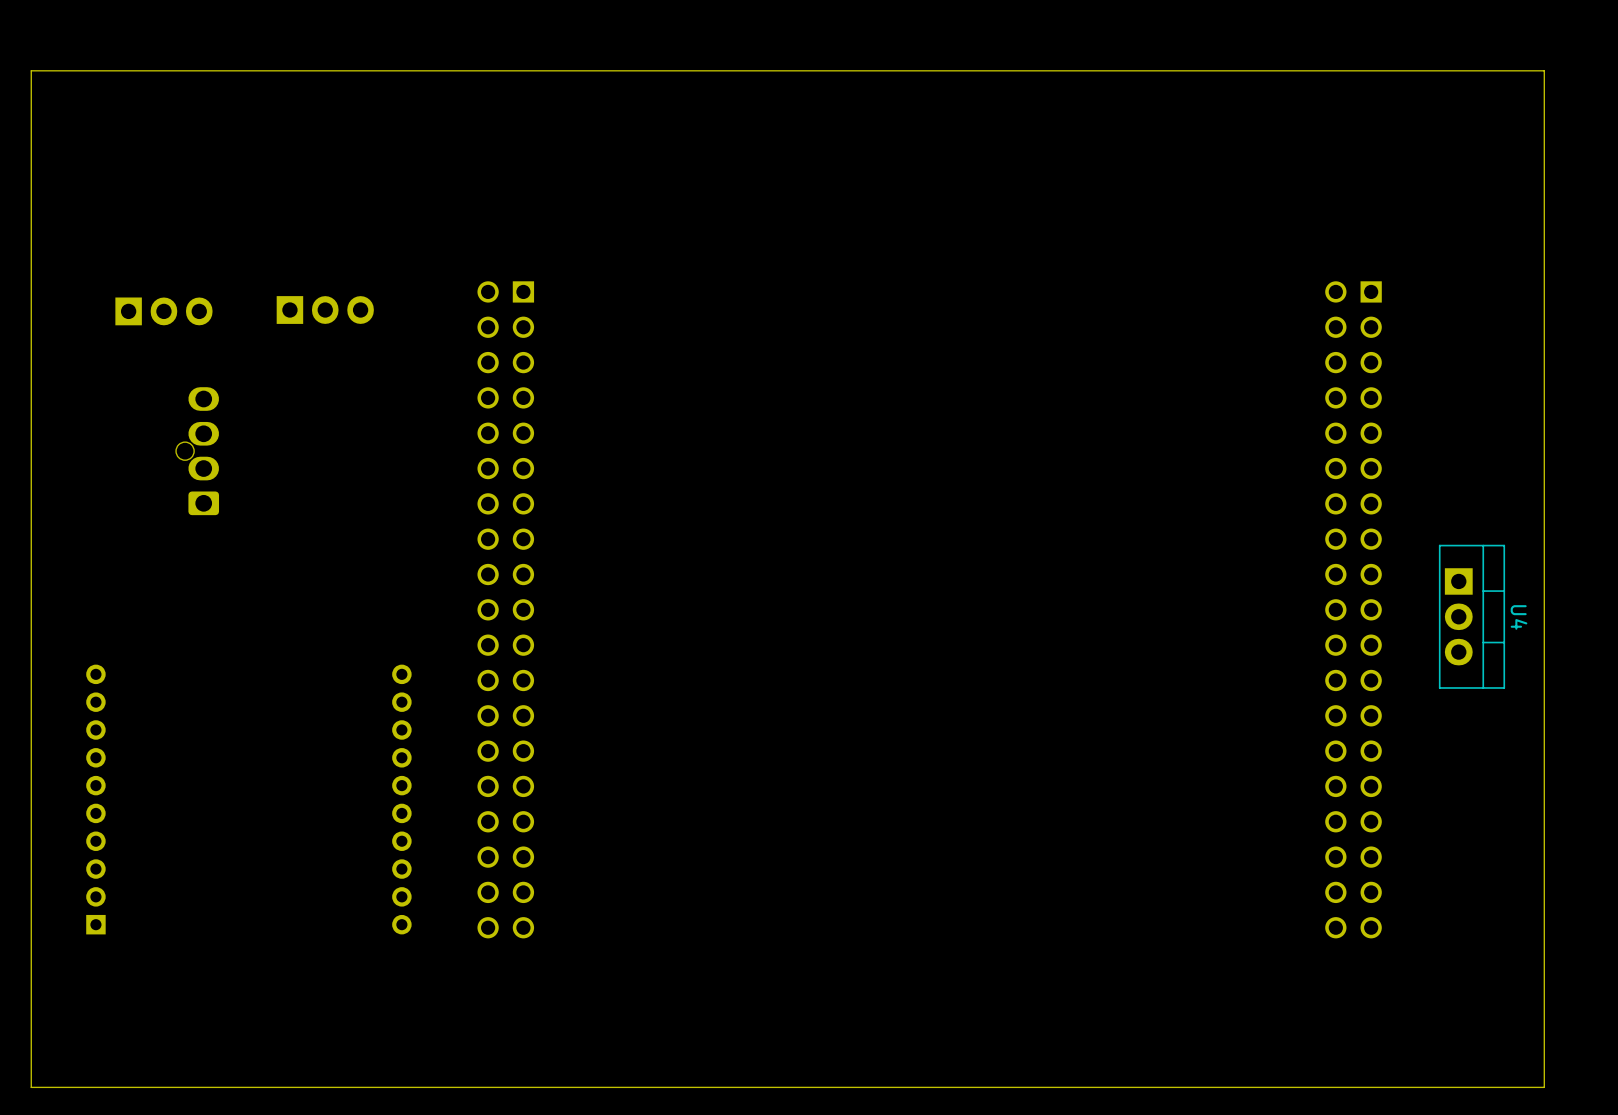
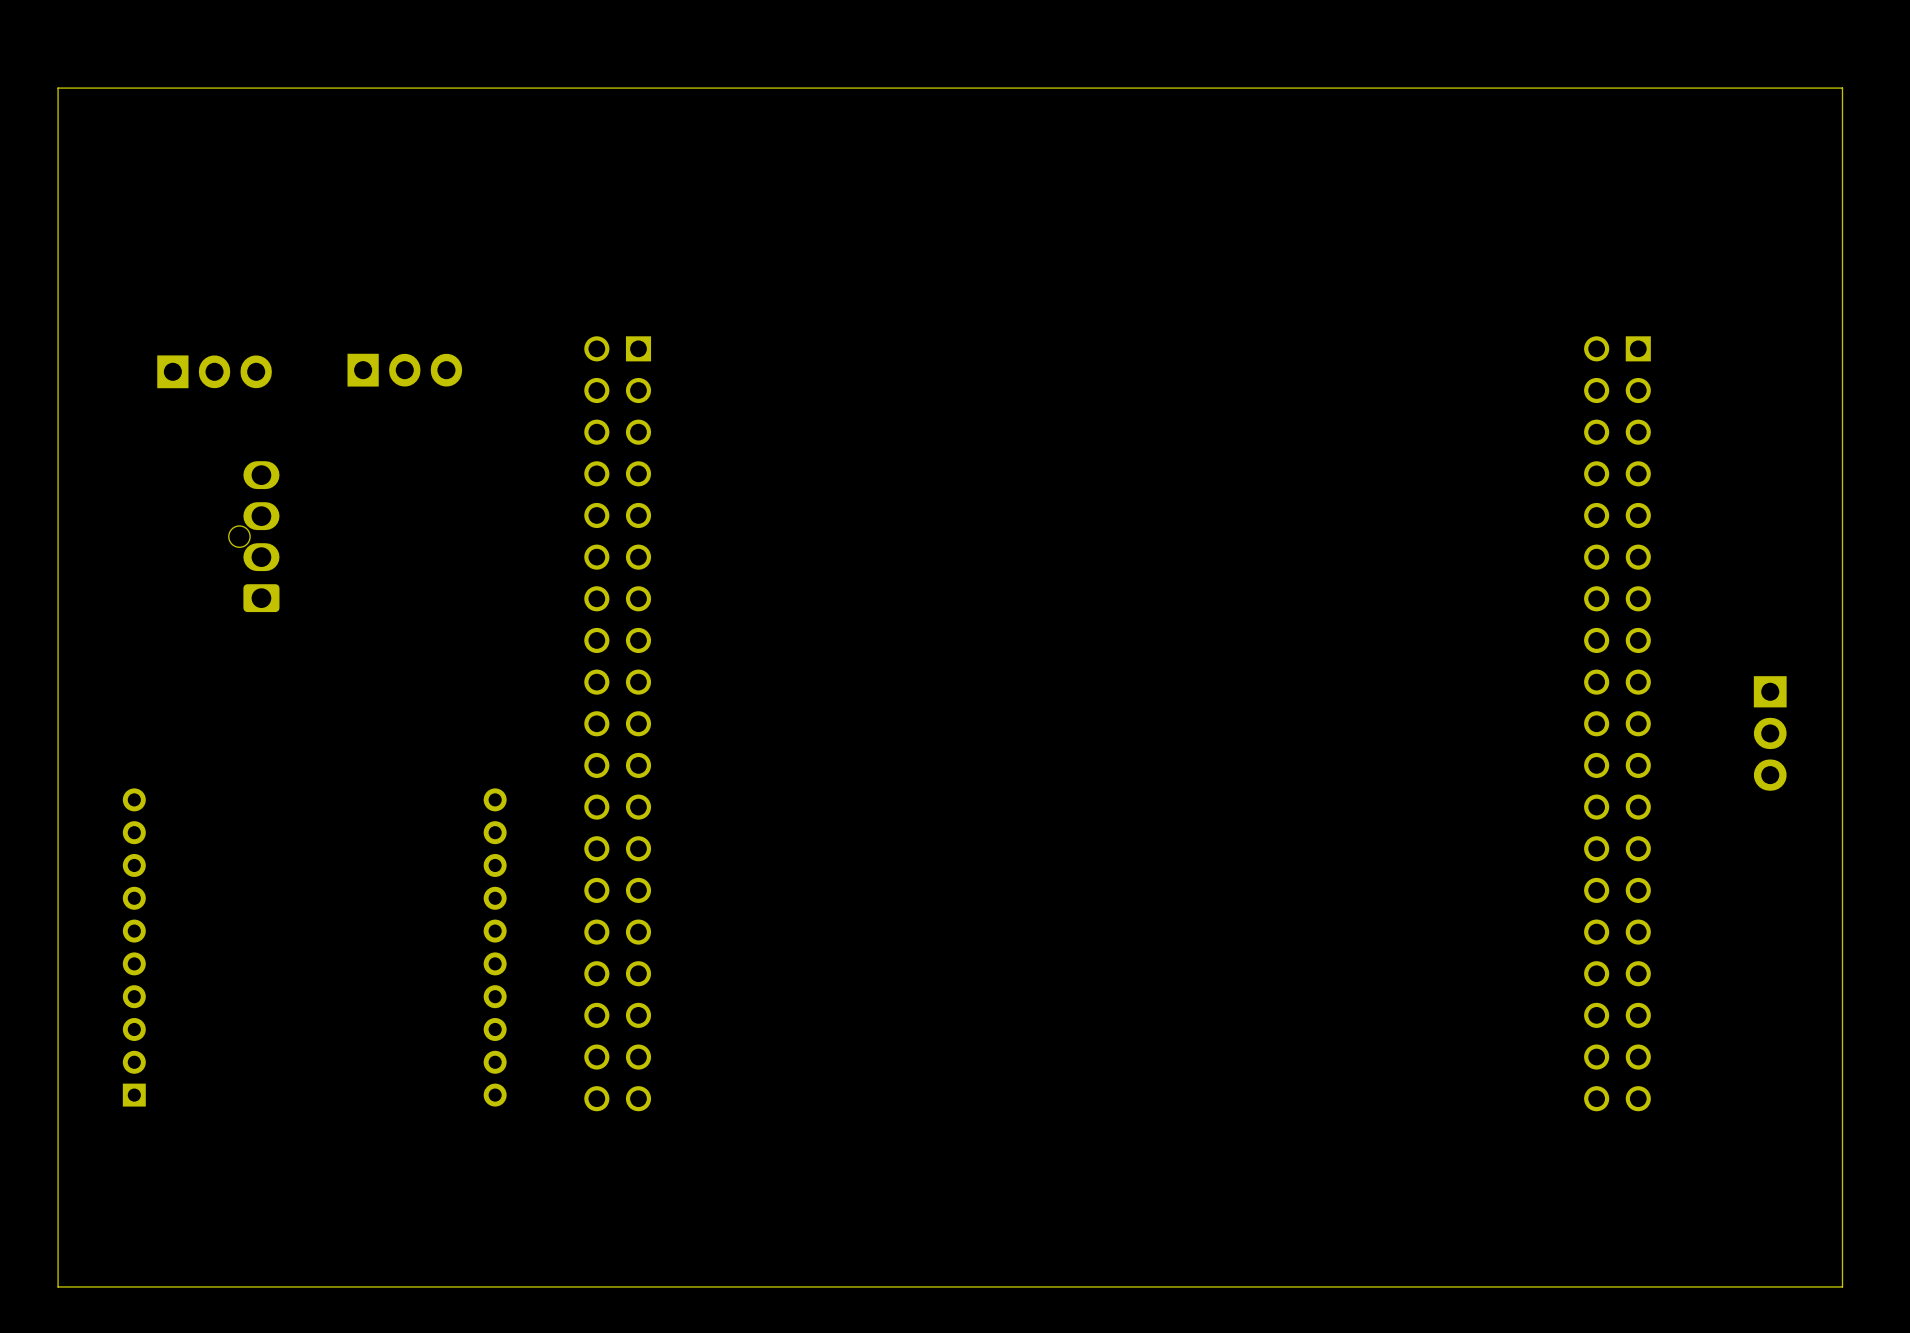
U4 side: bottom (1471, 616) -> top (1770, 733)

